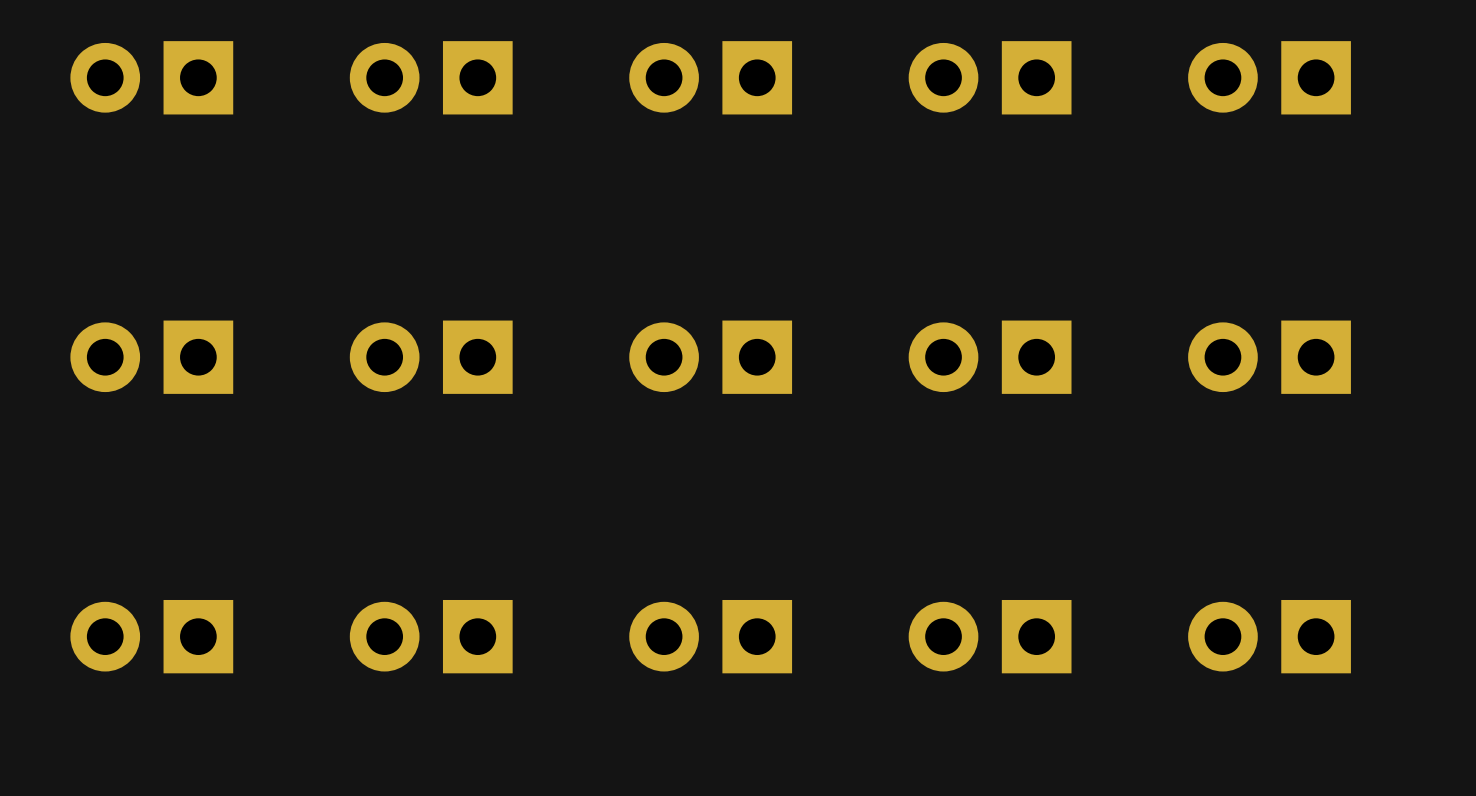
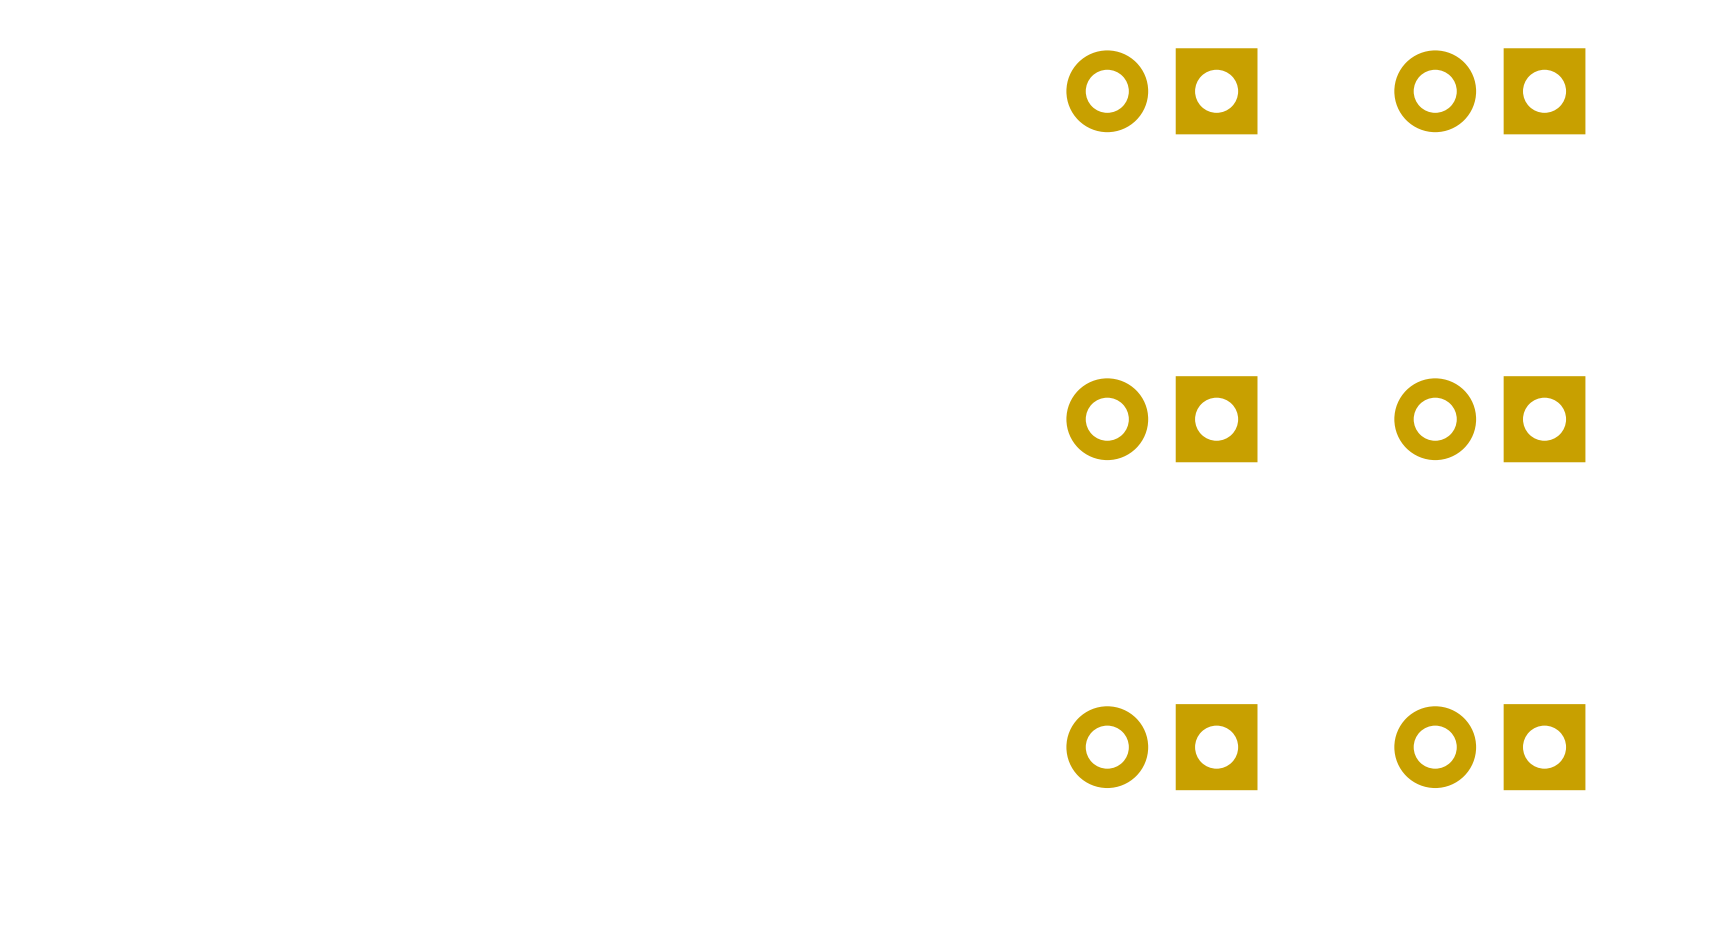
part: (151, 77) -> none
part: (431, 77) -> none
part: (710, 77) -> none
part: (151, 357) -> none
part: (431, 357) -> none
part: (710, 357) -> none
part: (151, 636) -> none
part: (431, 636) -> none
part: (710, 636) -> none

